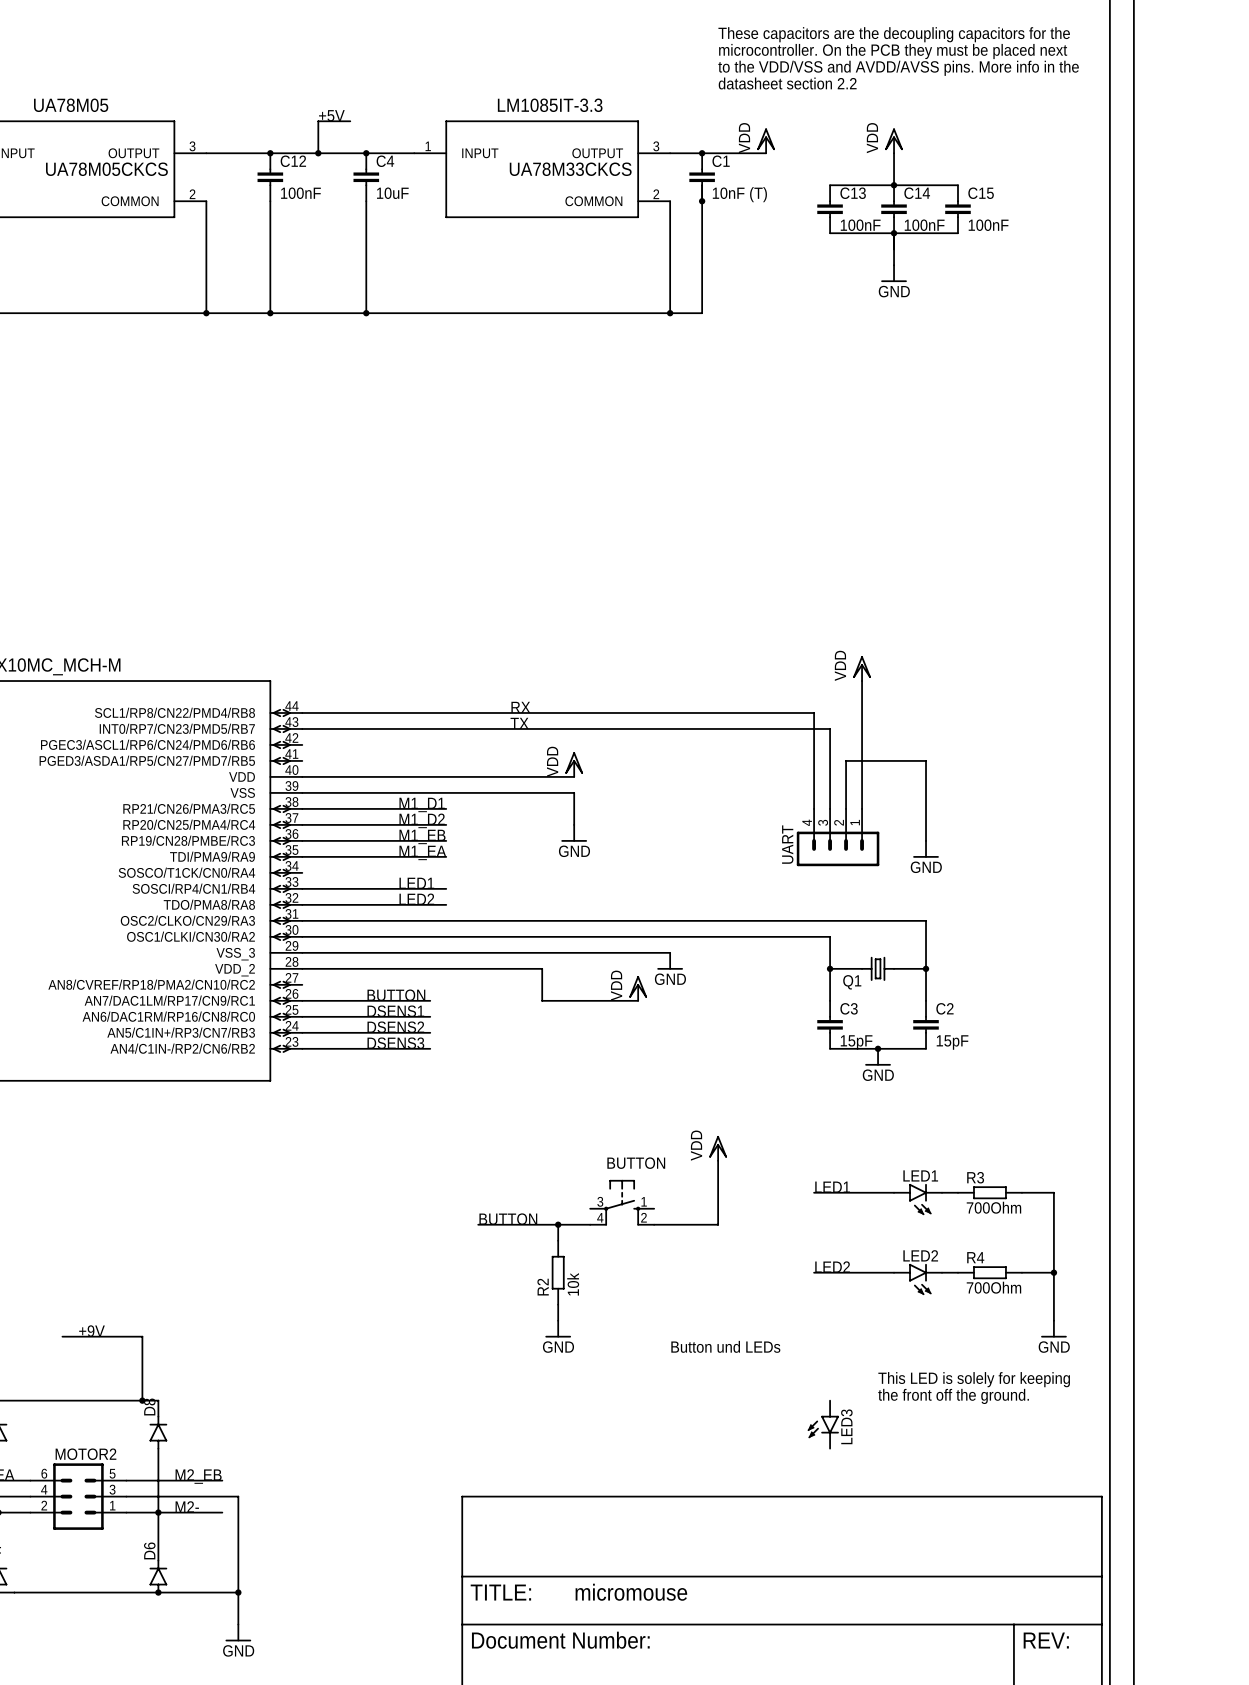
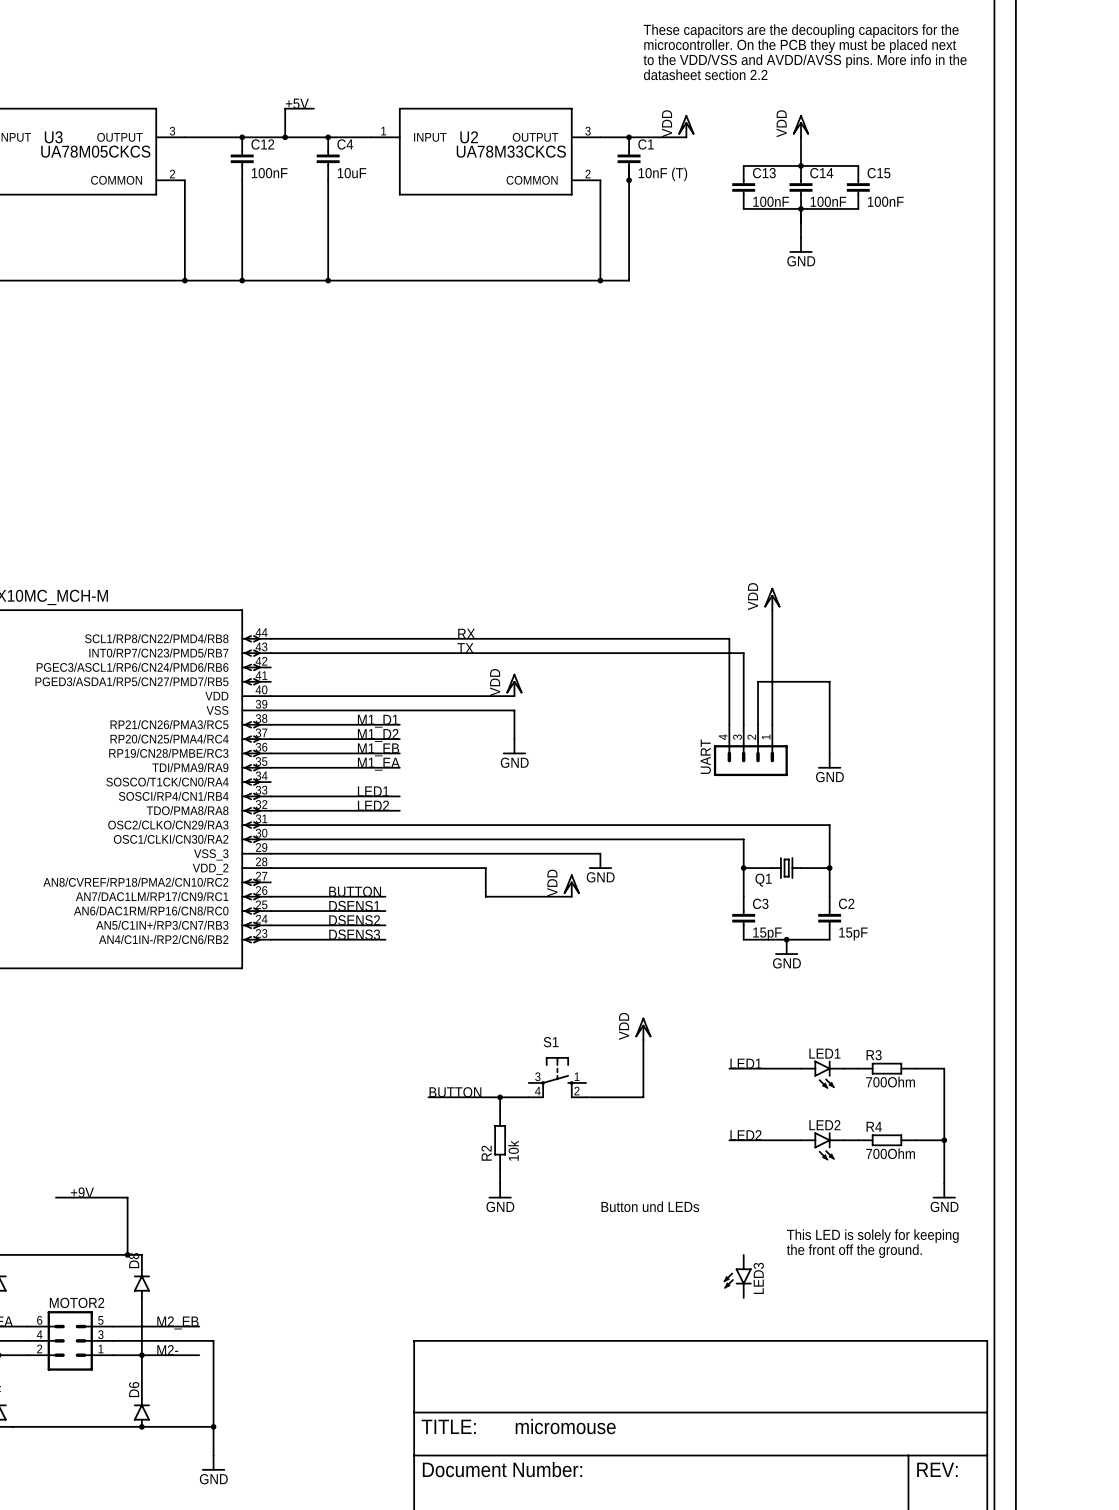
UA78M05 name: UA78M05 (71, 105) -> U3 (53, 137)
LM1085IT-3.3 name: LM1085IT-3.3 (550, 105) -> U2 (469, 137)
BUTTON name: BUTTON (636, 1163) -> S1 (551, 1042)

